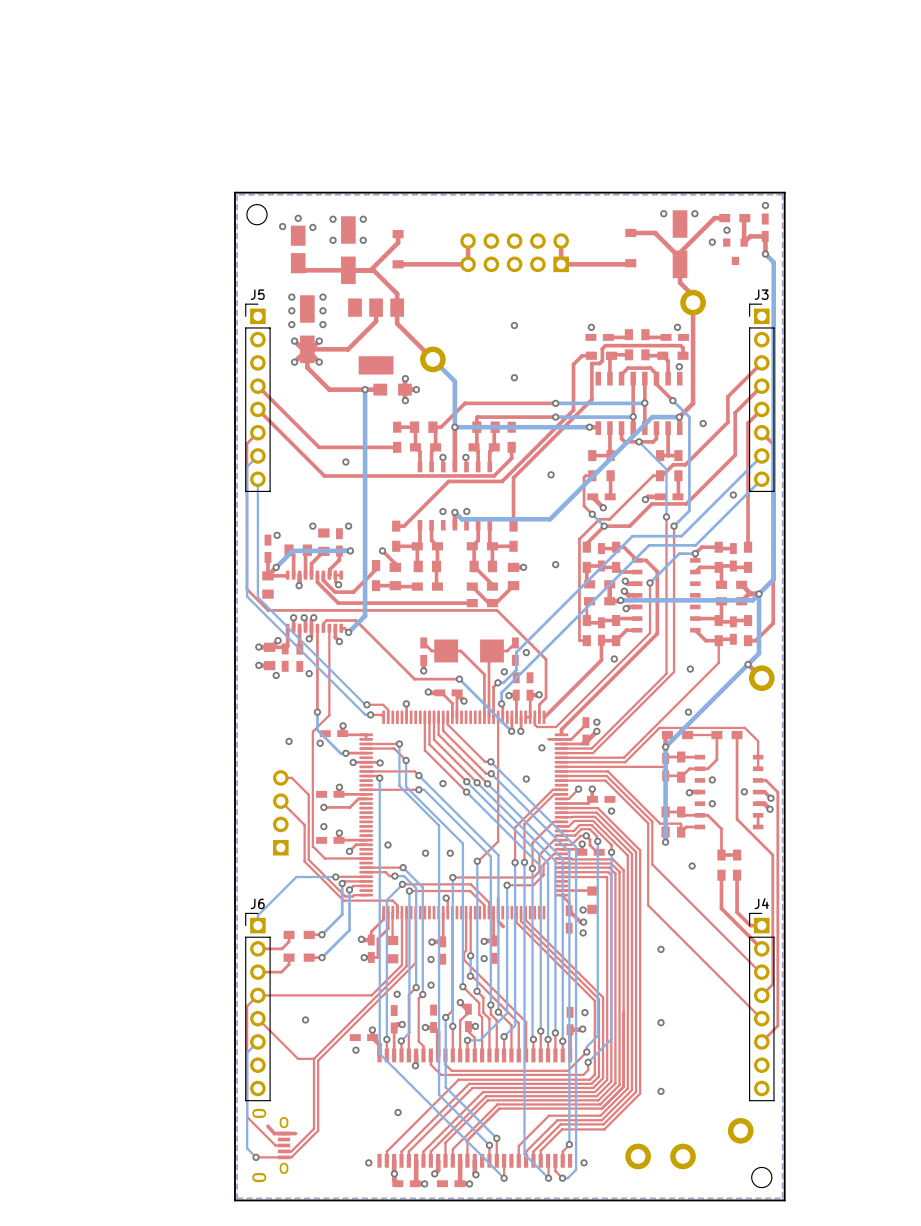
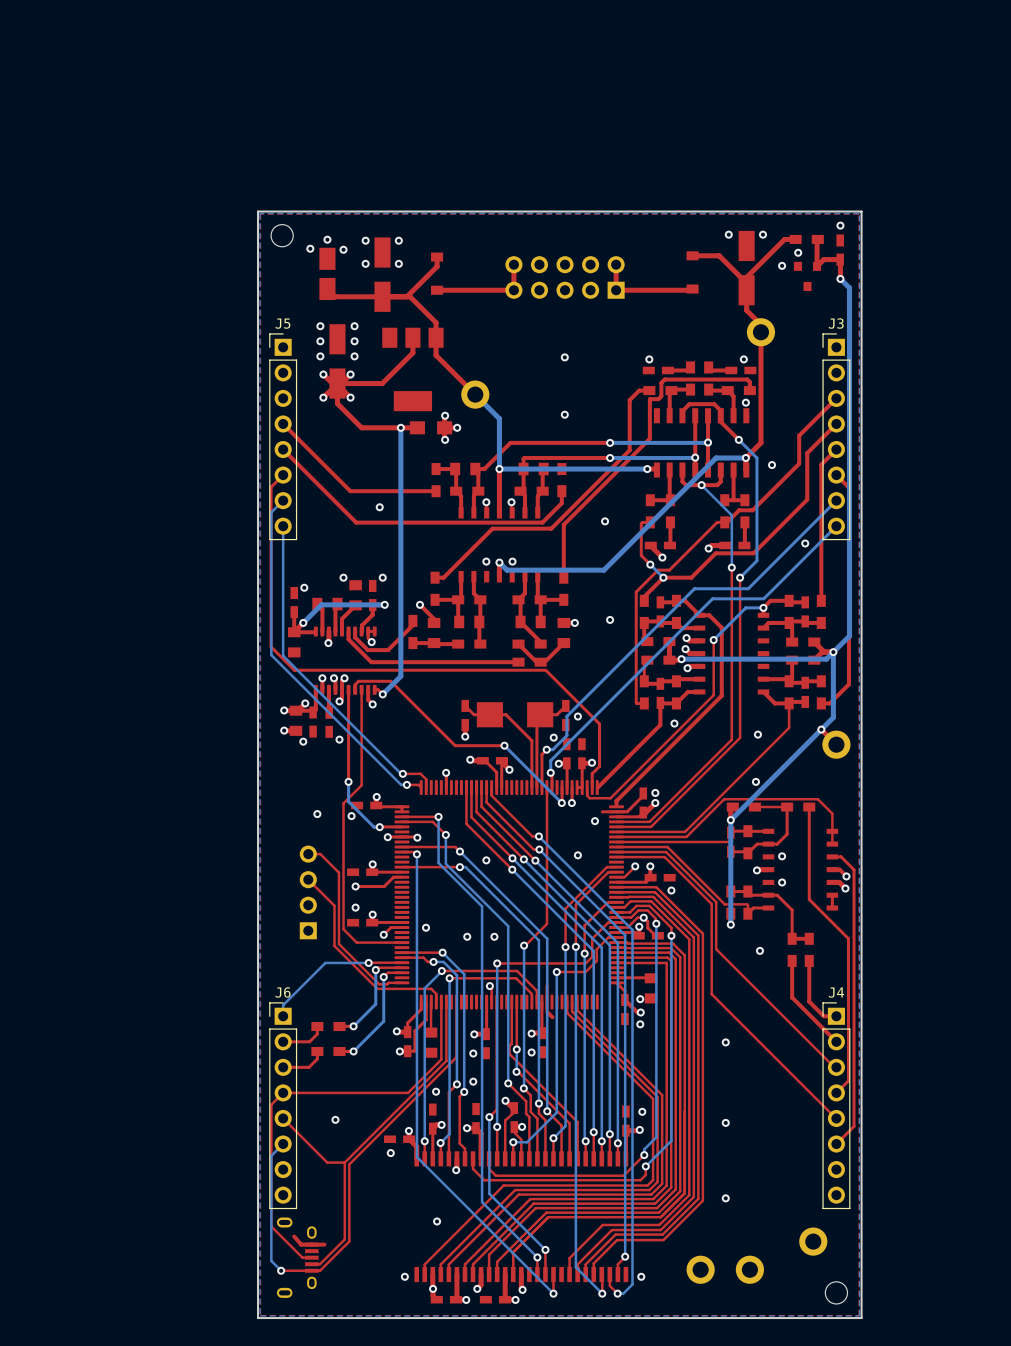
via: (744, 791) -> none

